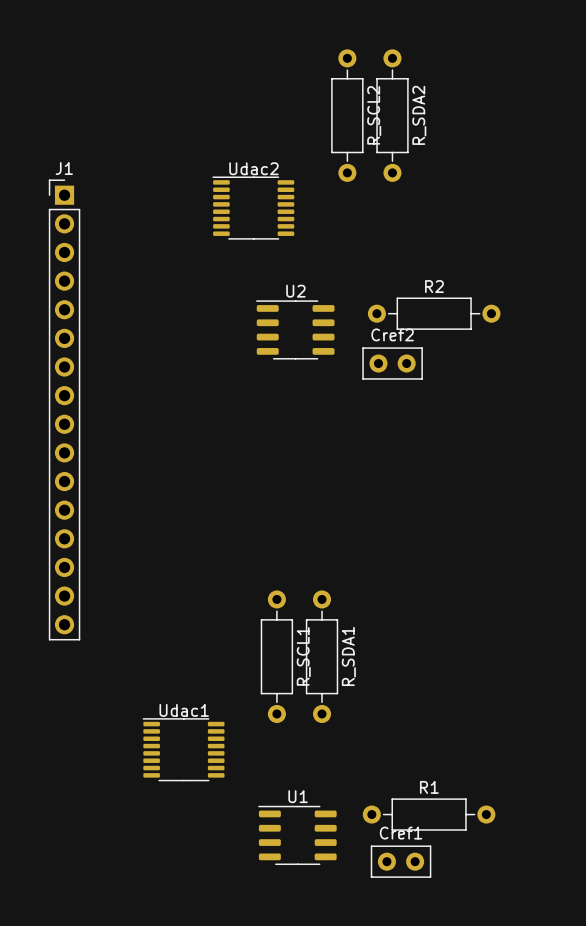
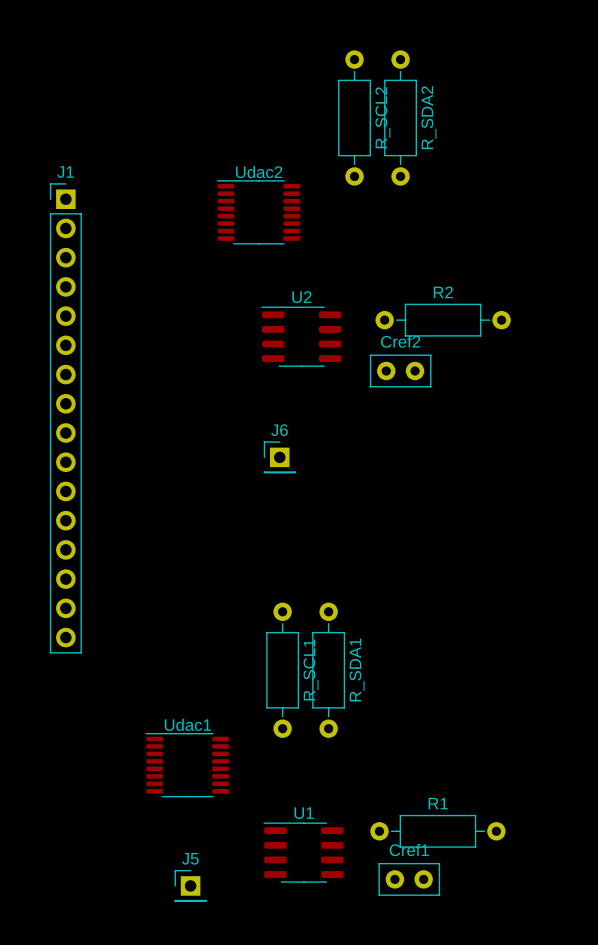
J6: none -> (279, 457)
J5: none -> (190, 885)

